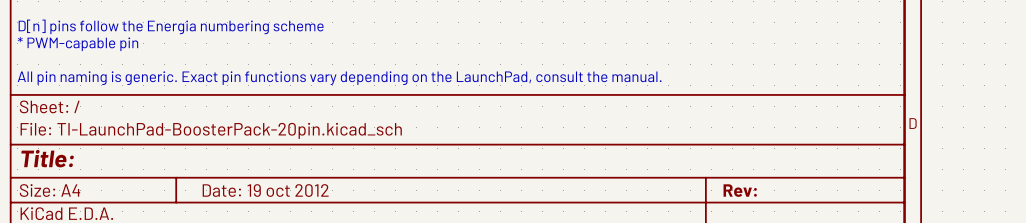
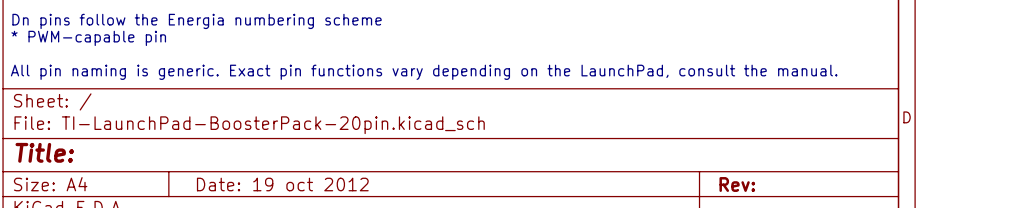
text: D[n] pins follow the Energia numbering scheme (171, 26) -> Dn pins follow the Energia numbering scheme (197, 21)

